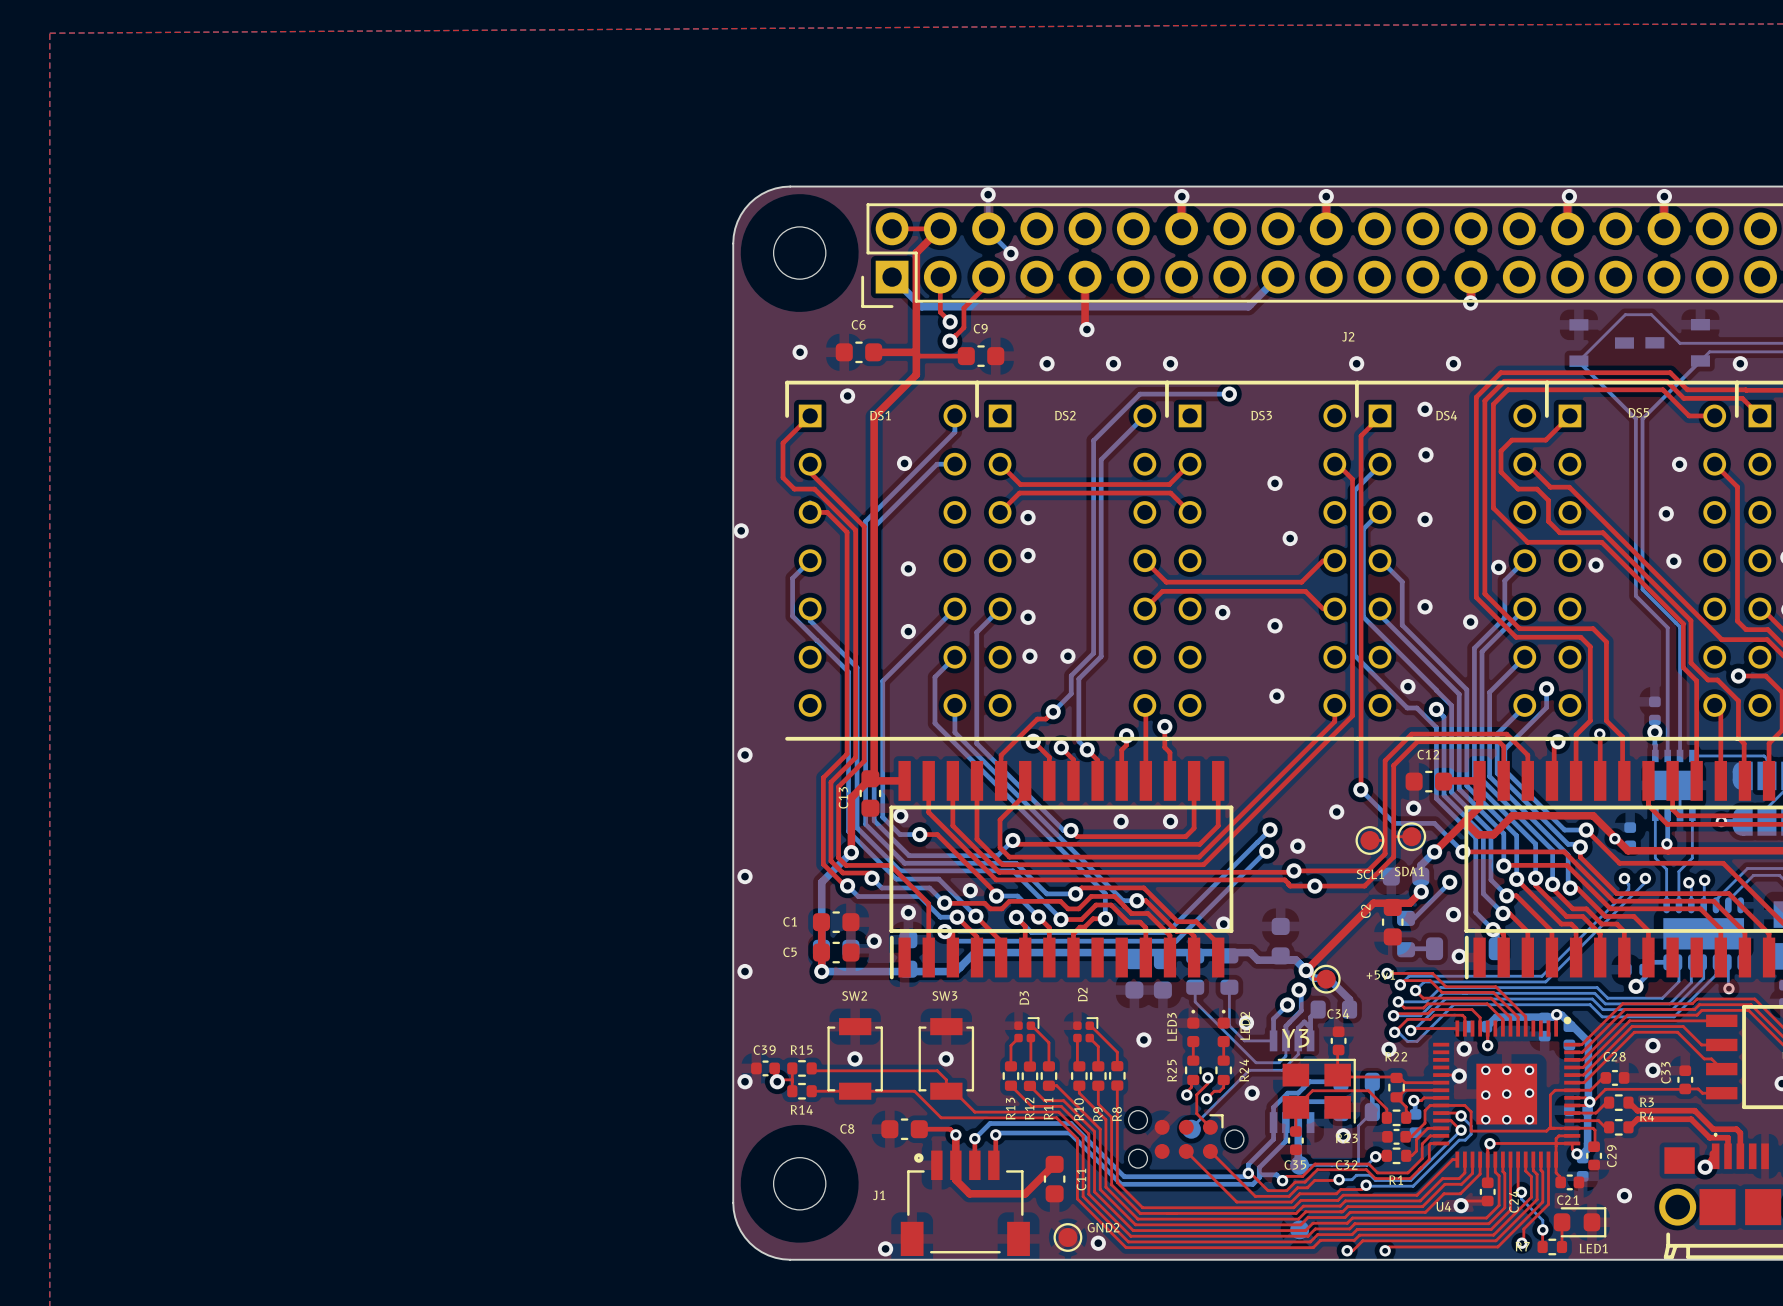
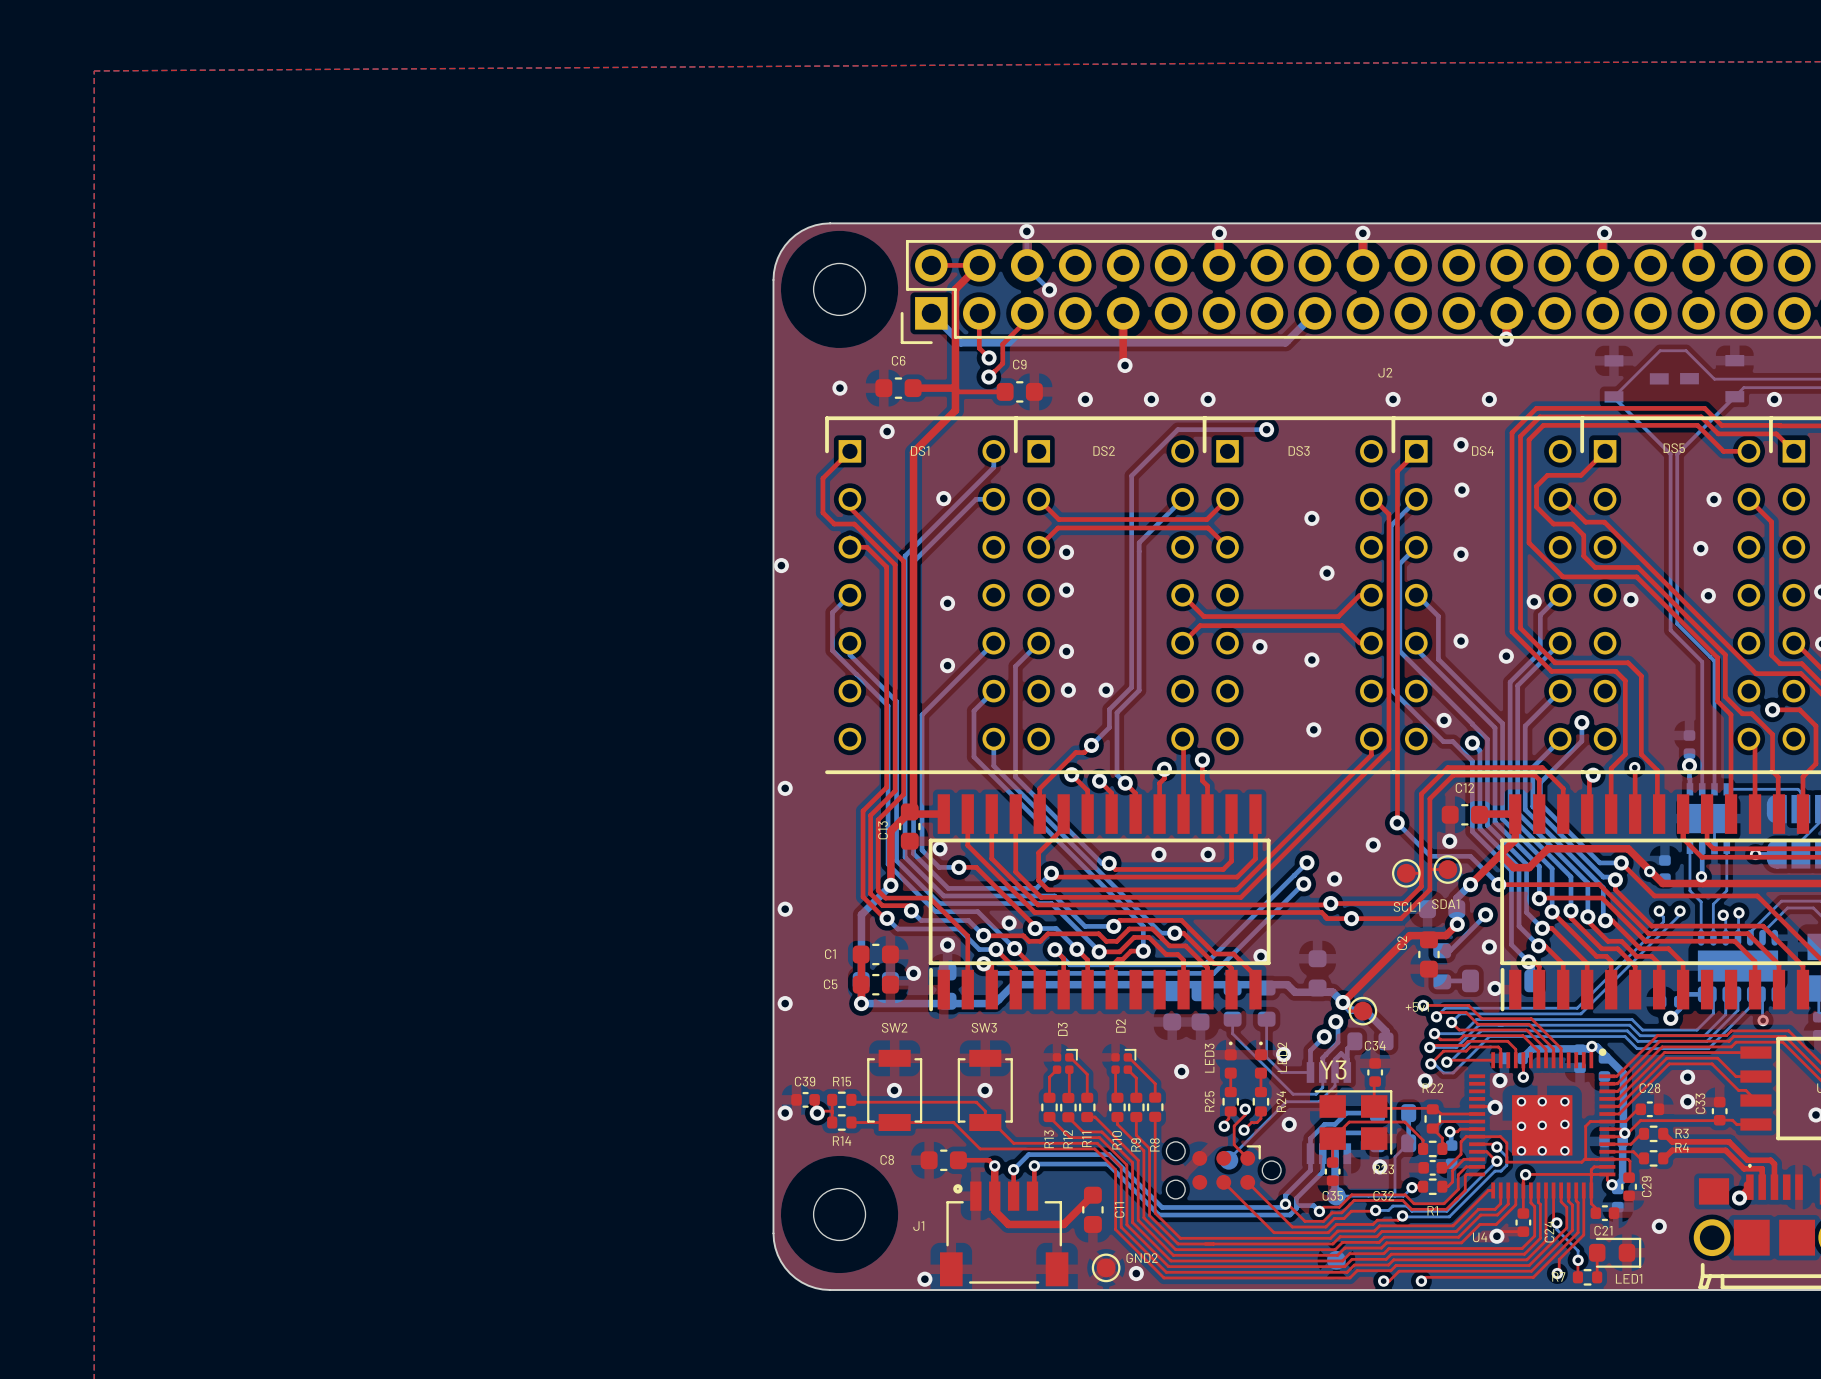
bottom track: (1144, 415) (1101, 459) (1101, 507) -> (1182, 499) (1139, 542)

